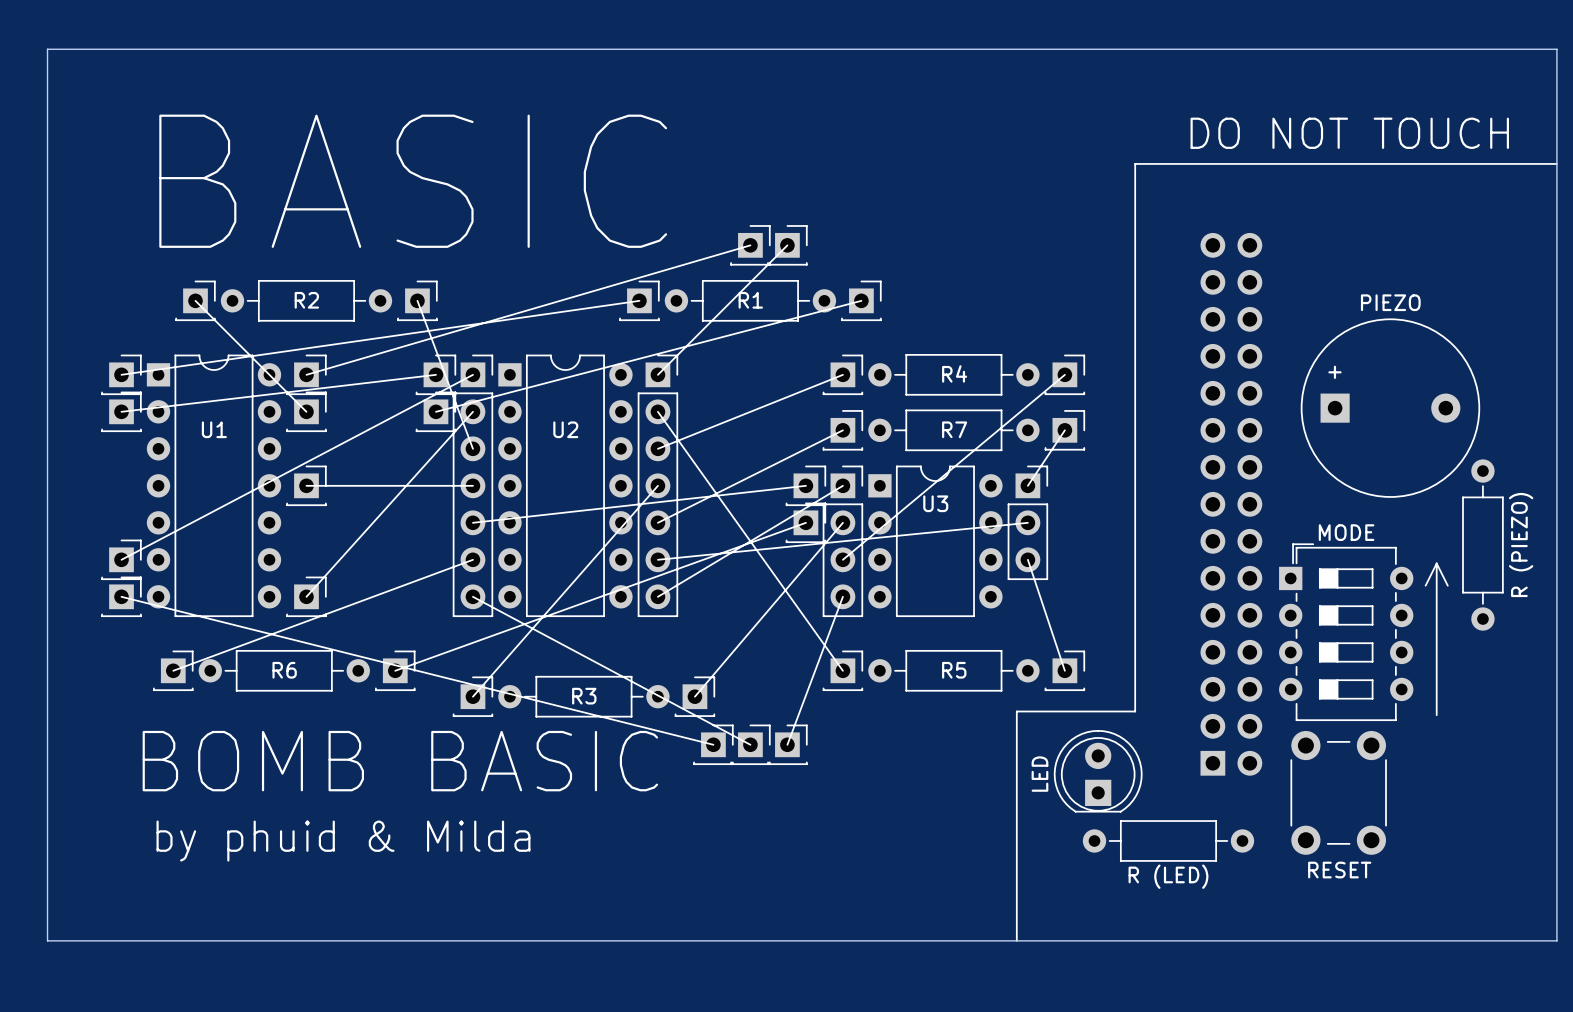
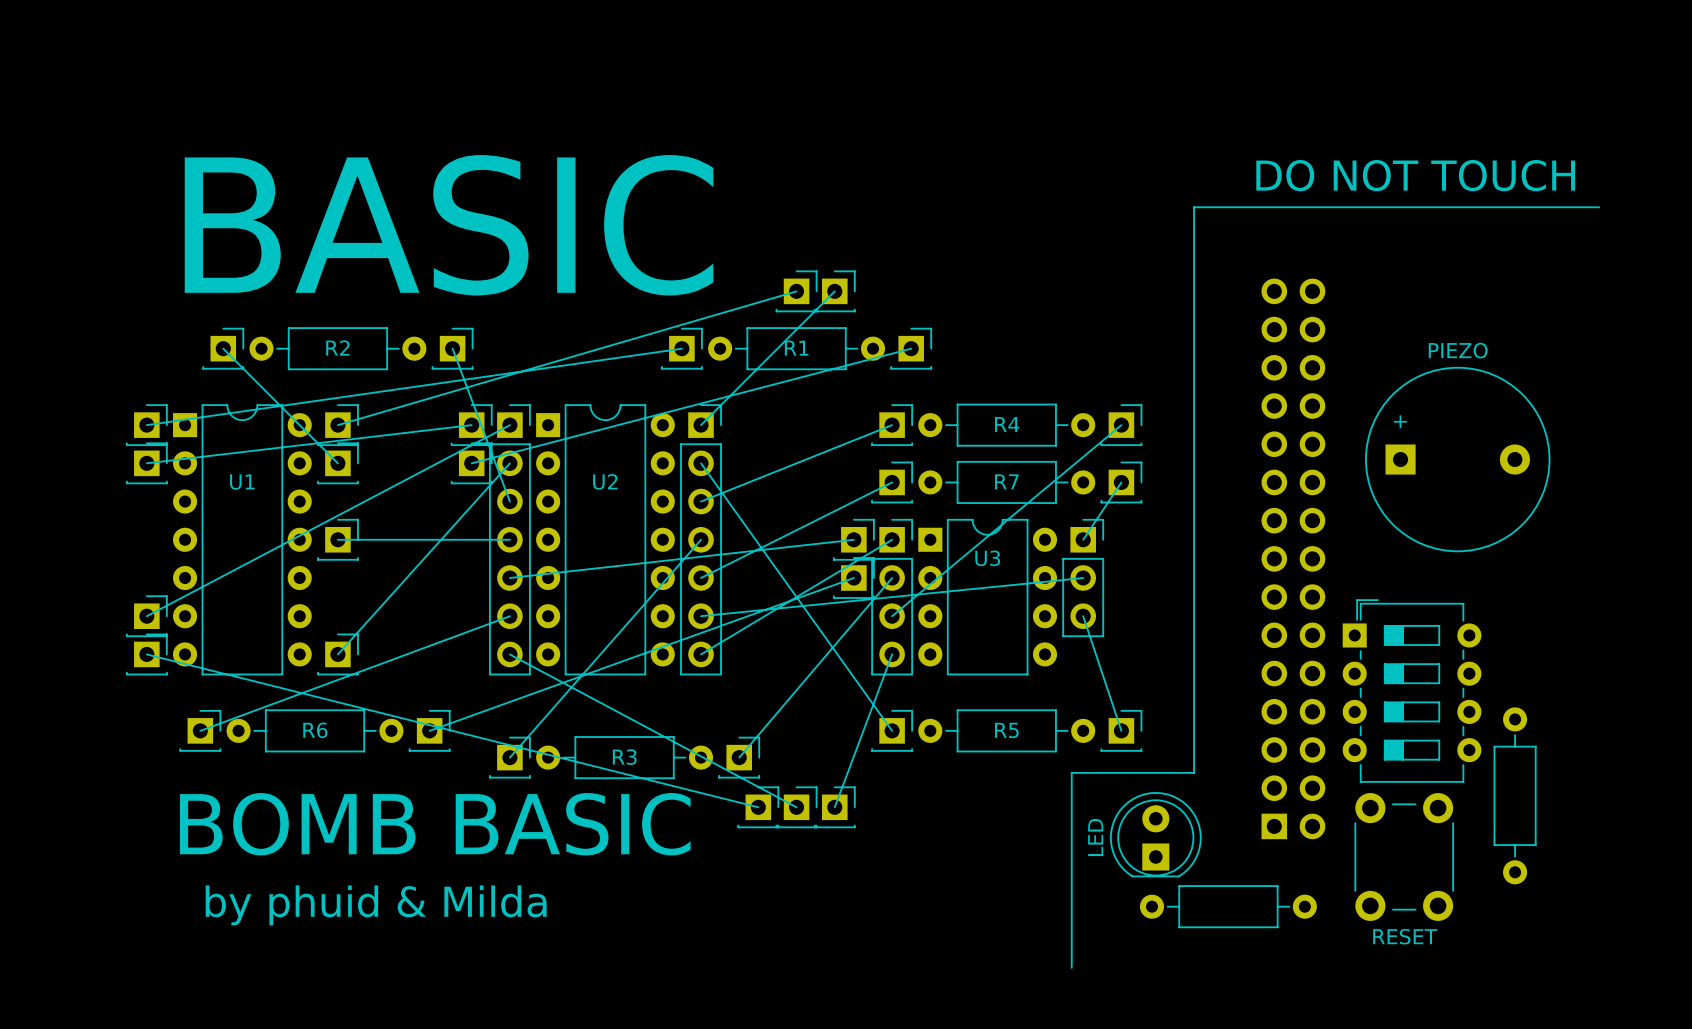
board edge: (47, 49) (1556, 49) (1556, 940) (47, 940) (47, 49) -> none
line: (1527, 163) (1556, 163) -> none
MODE name: MODE (1346, 532) -> none
R (PIEZO): (1482, 545) -> none
line: (1436, 563) (1425, 585) -> none
line: (1436, 563) (1436, 715) -> none
line: (1436, 563) (1447, 585) -> none
part: none -> (1515, 795)
R (LED) name: R (LED) (1168, 876) -> none
line: (1016, 900) (1016, 940) -> none

